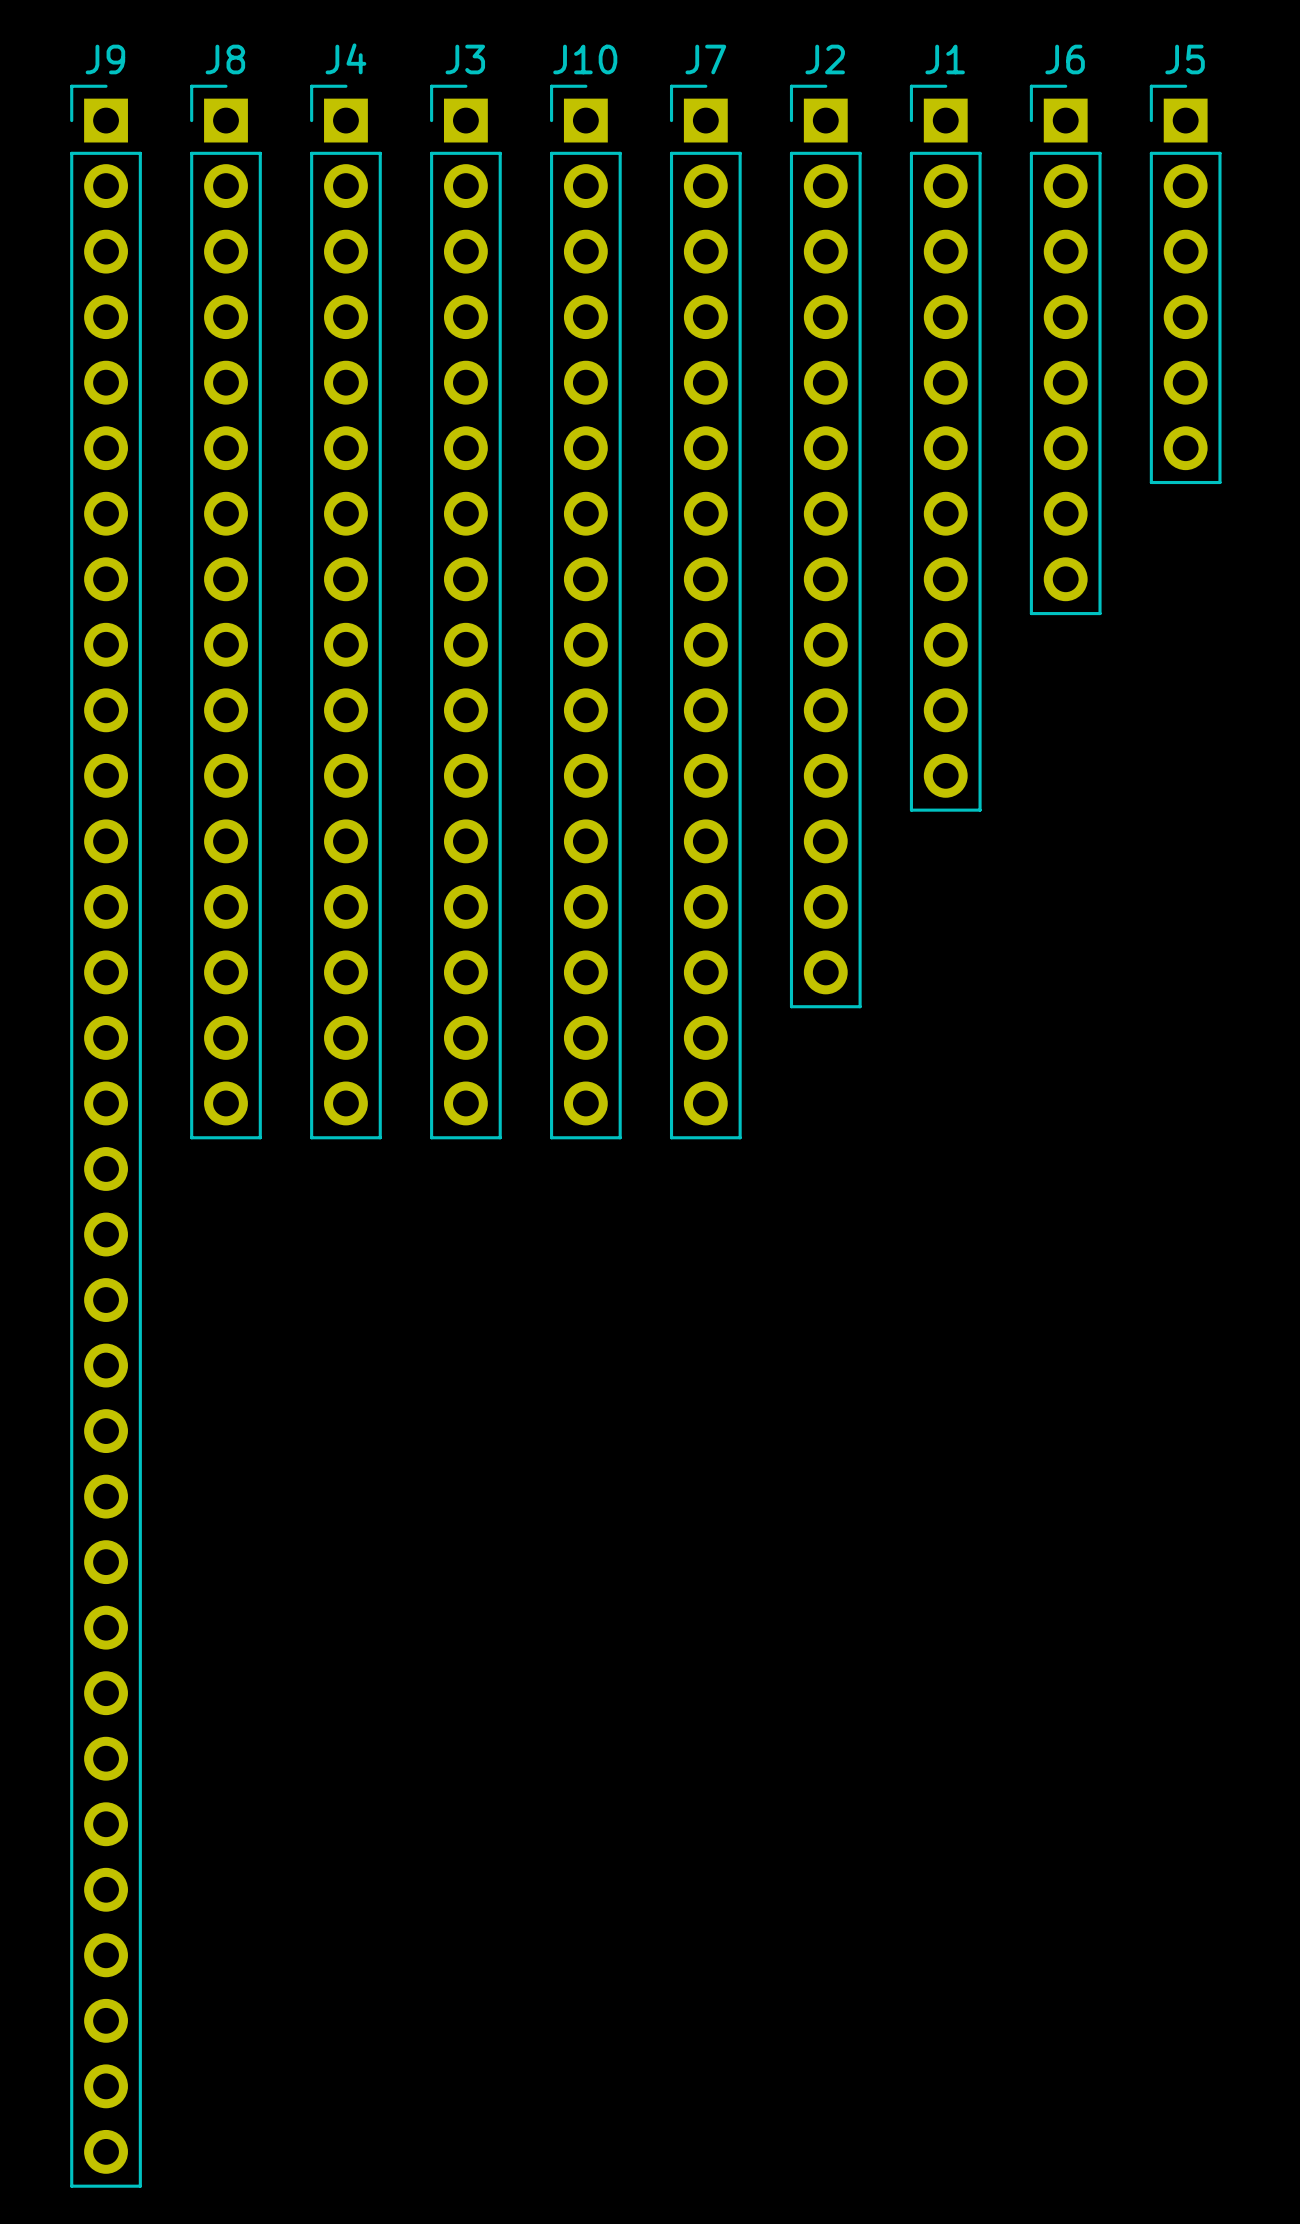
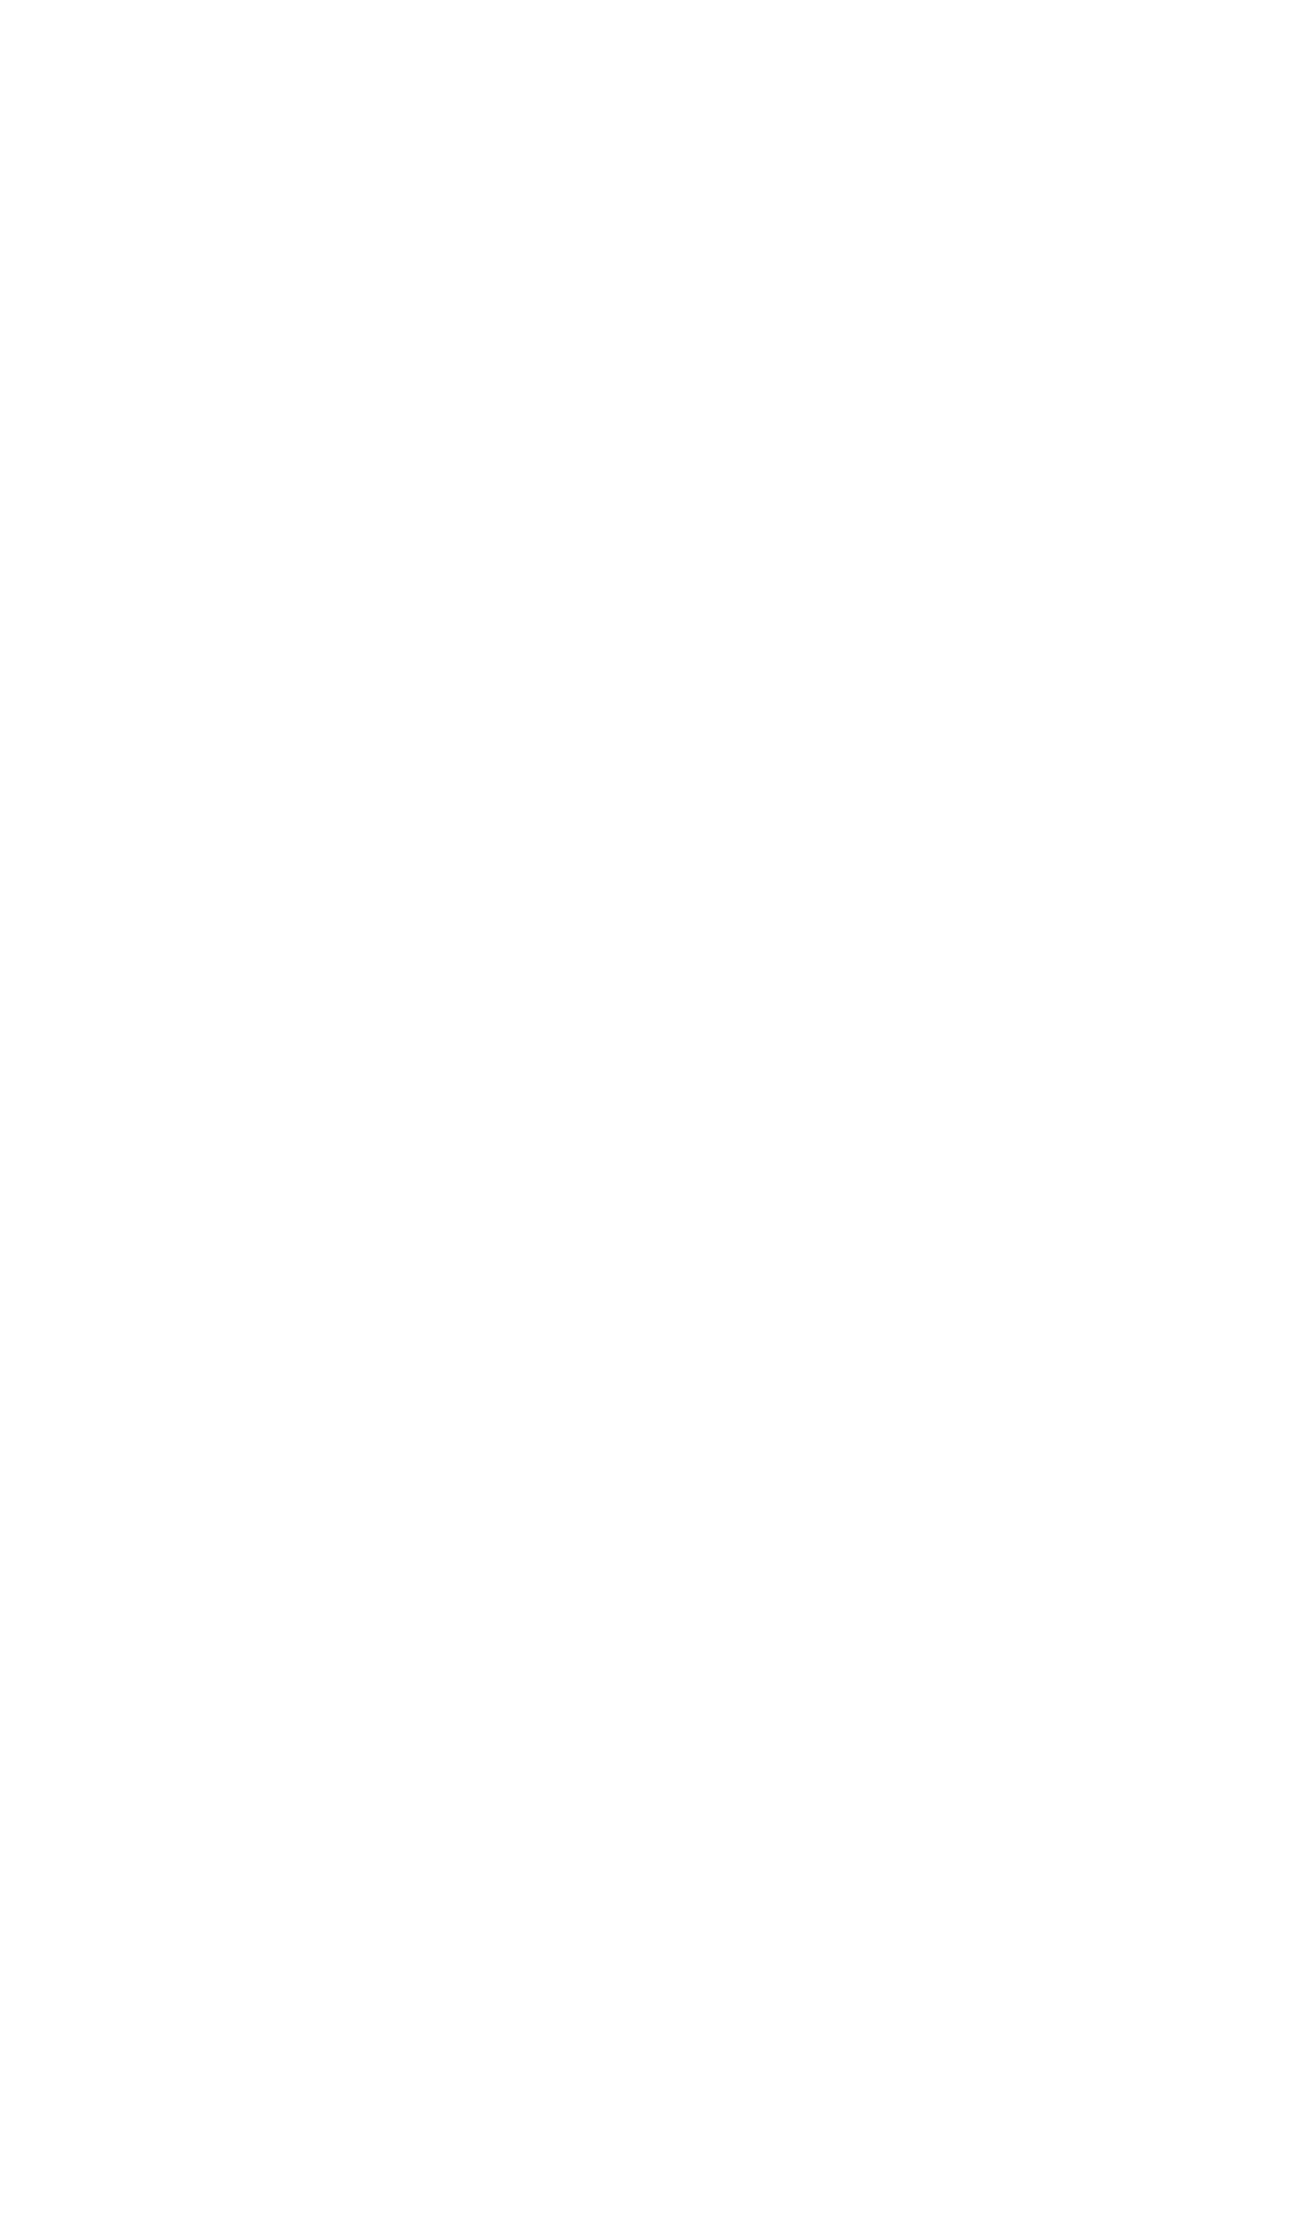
J5: (1185, 284) -> none
J6: (1065, 349) -> none
J1: (945, 448) -> none
J2: (825, 546) -> none
J8: (225, 612) -> none
J4: (345, 612) -> none
J3: (465, 612) -> none
J10: (585, 612) -> none
J7: (705, 612) -> none
J9: (106, 1136) -> none

